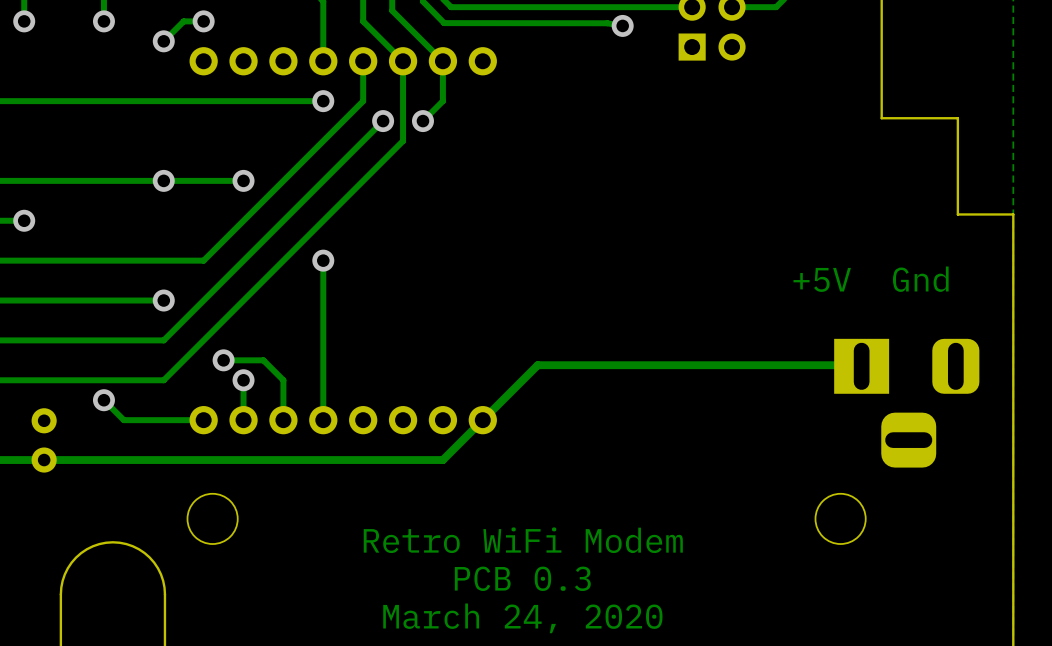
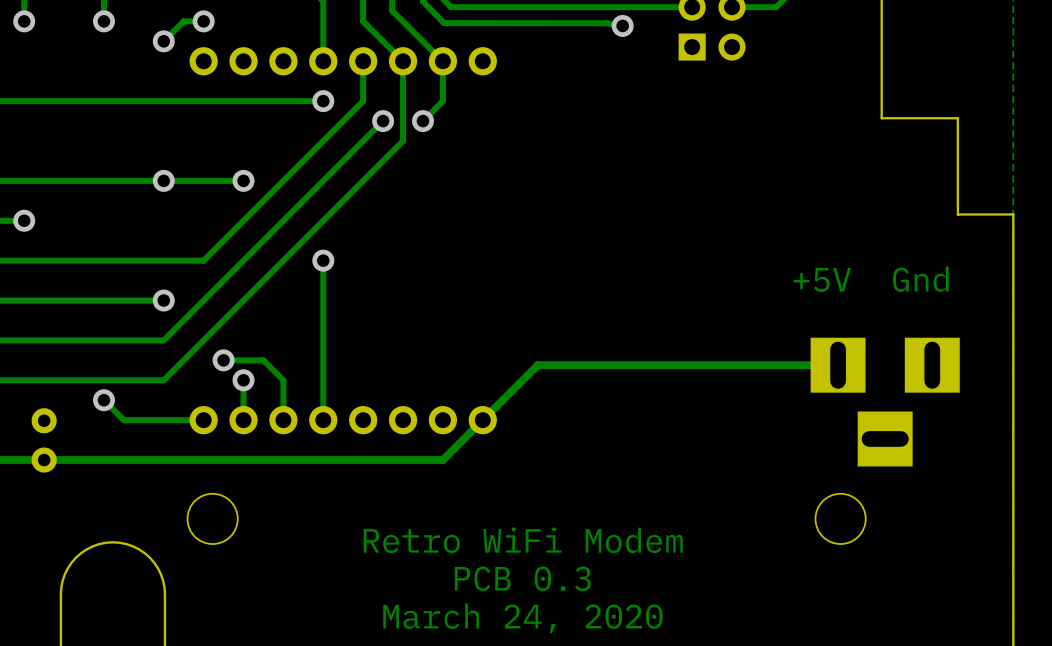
part: none -> (885, 402)
part: (906, 403) -> none

